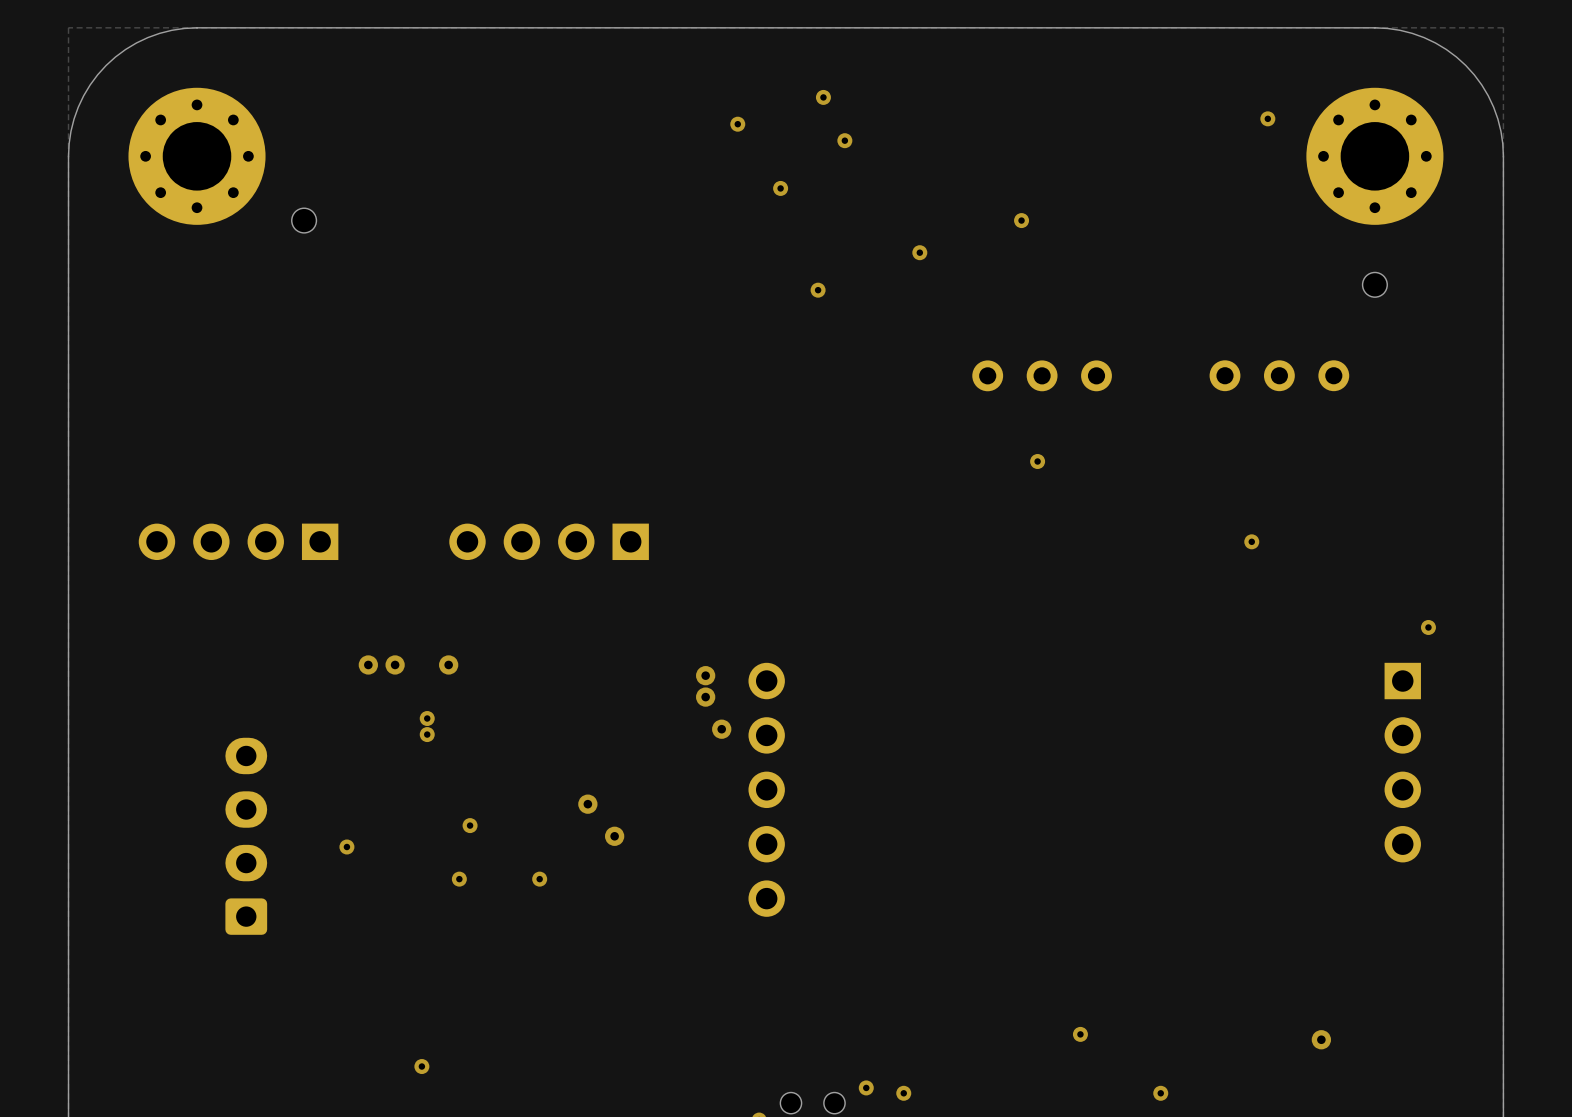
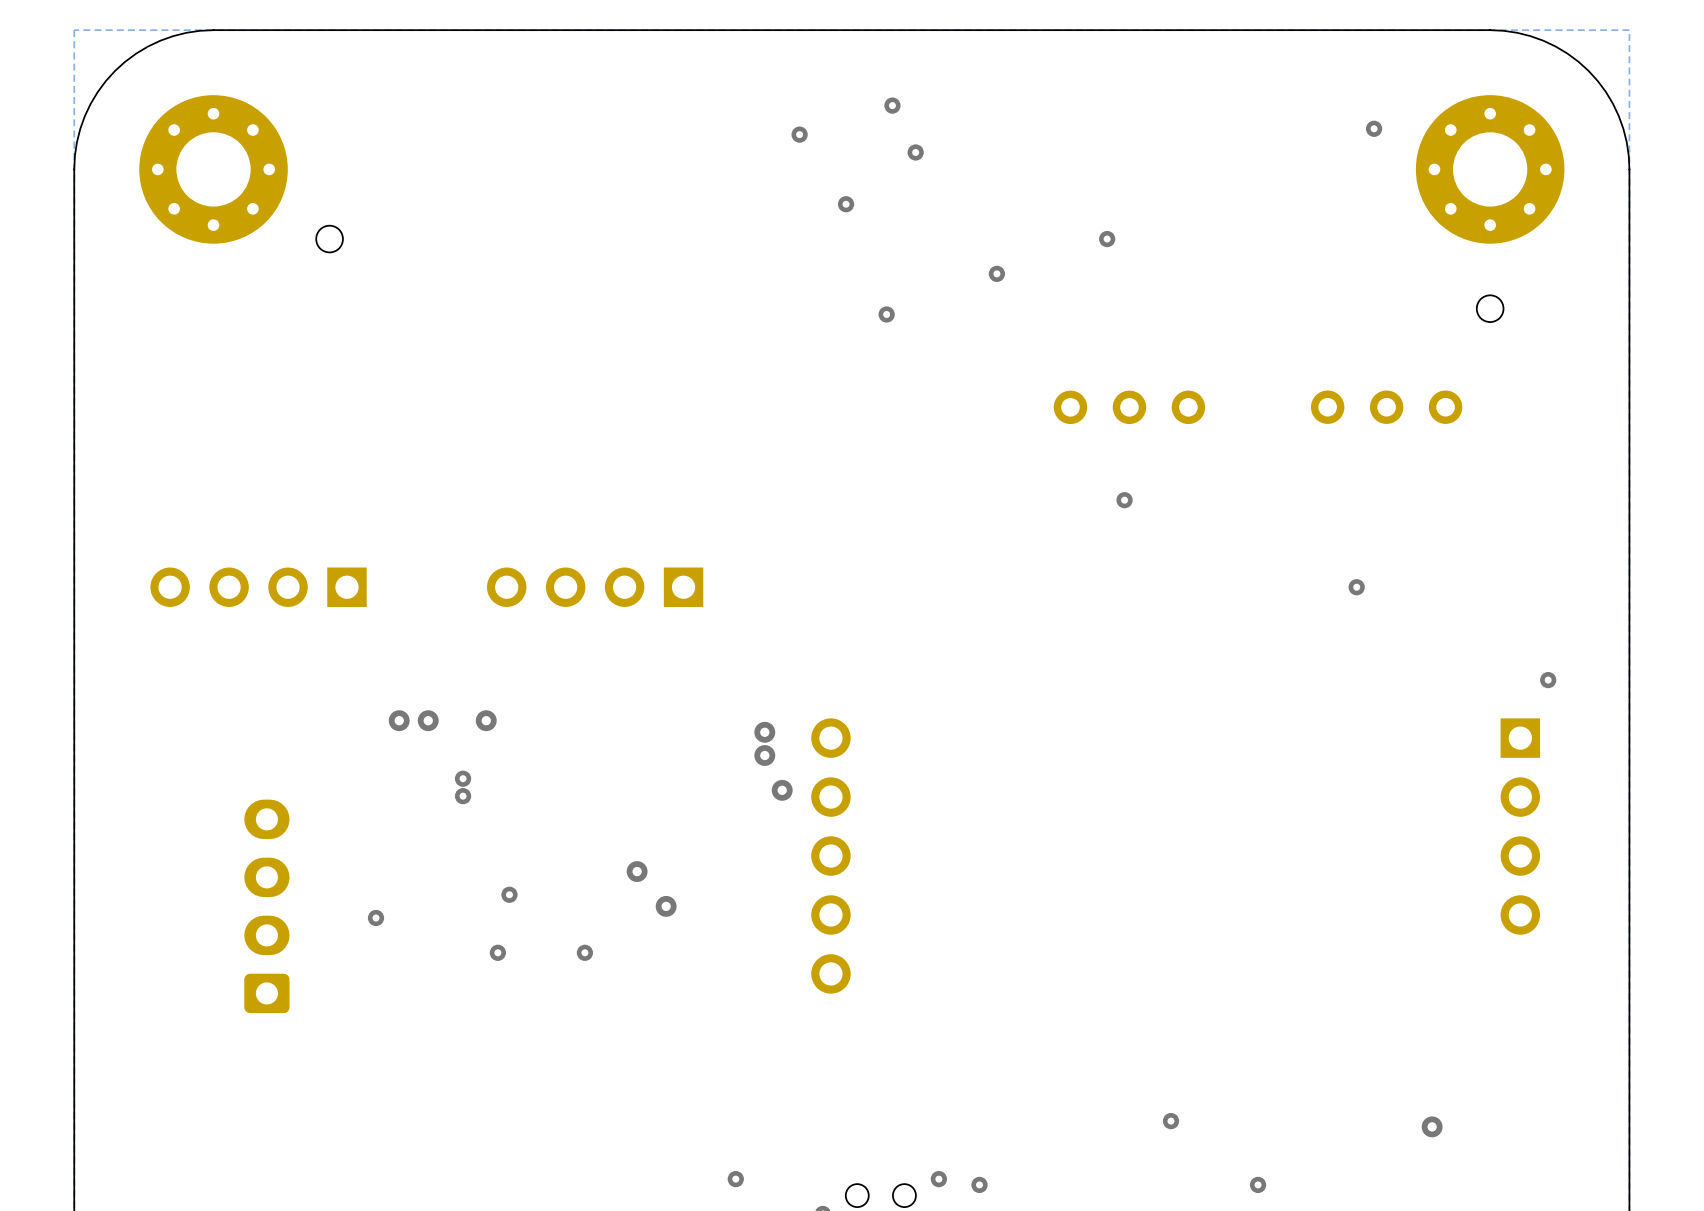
via: (421, 1066) -> none
via: none -> (735, 1179)

